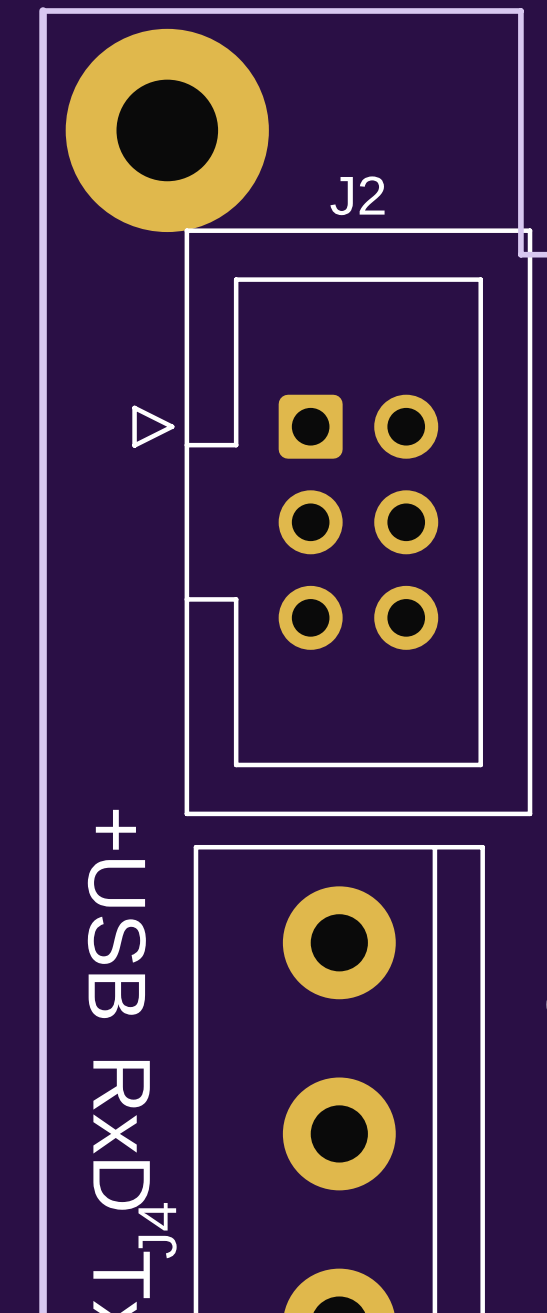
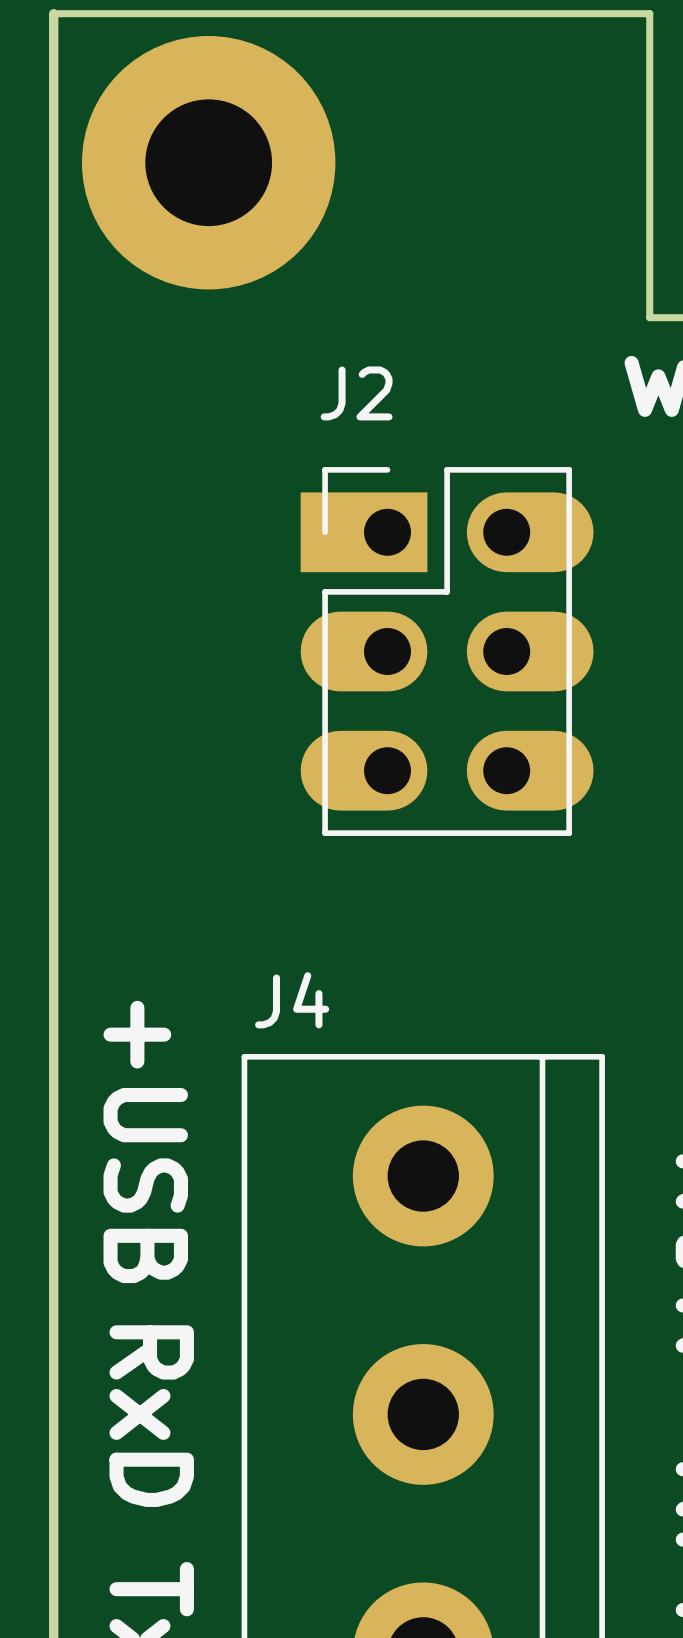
J2 name position: J2 (357, 195) -> J2 (356, 393)
J2 footprint: [132, 228, 533, 817] -> [300, 467, 594, 836]
J4 name rotation: 0° (157, 1230) -> 90° clockwise (292, 1000)
J4 name position: J4 (157, 1230) -> J4 (292, 1000)

